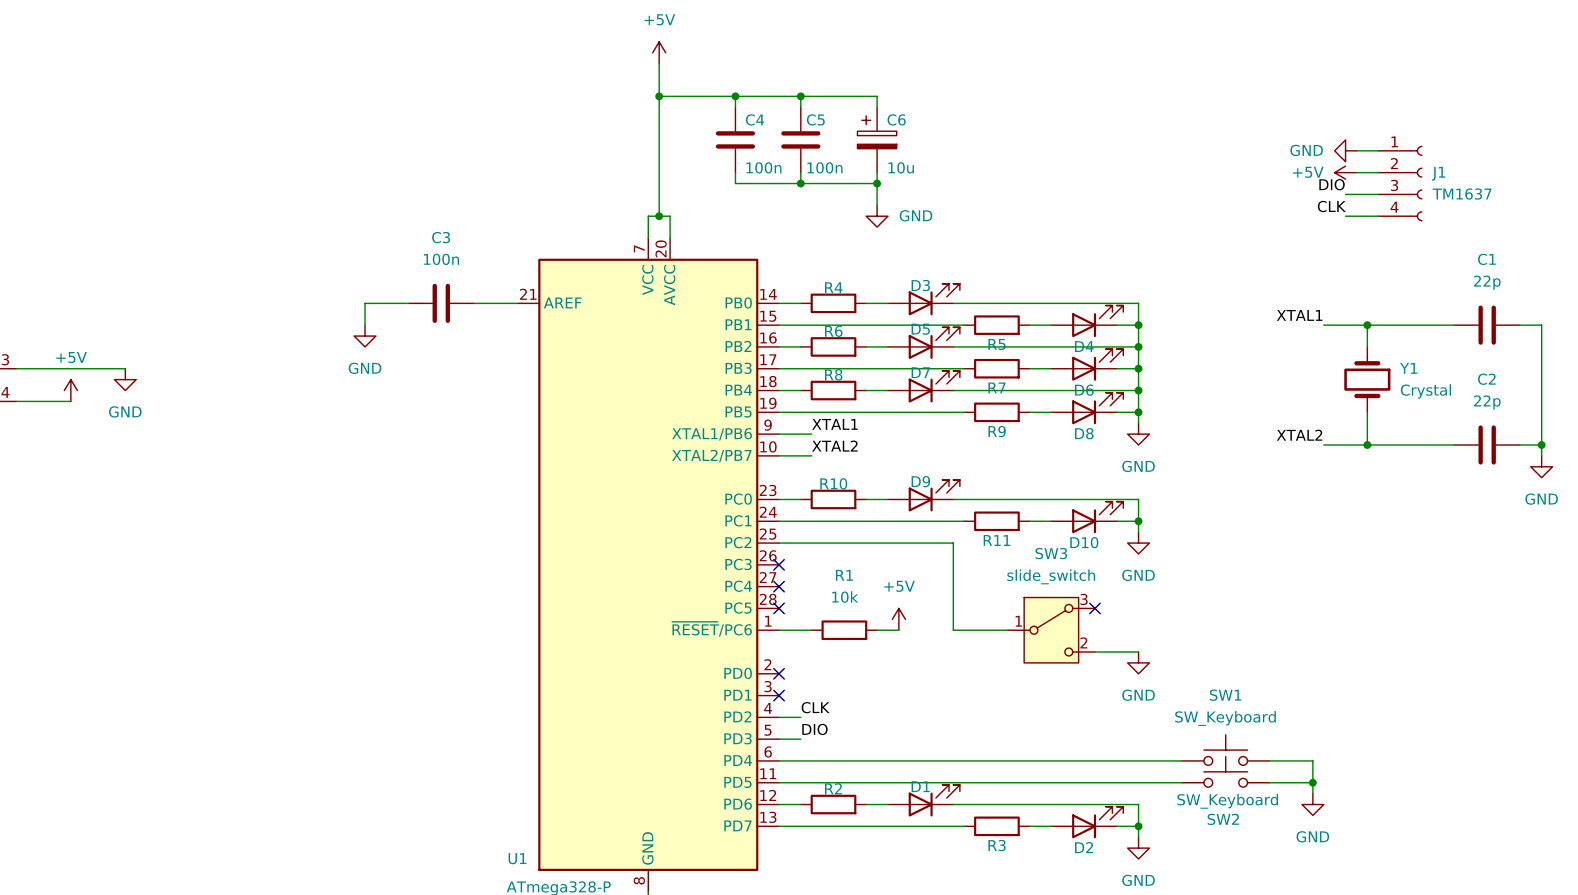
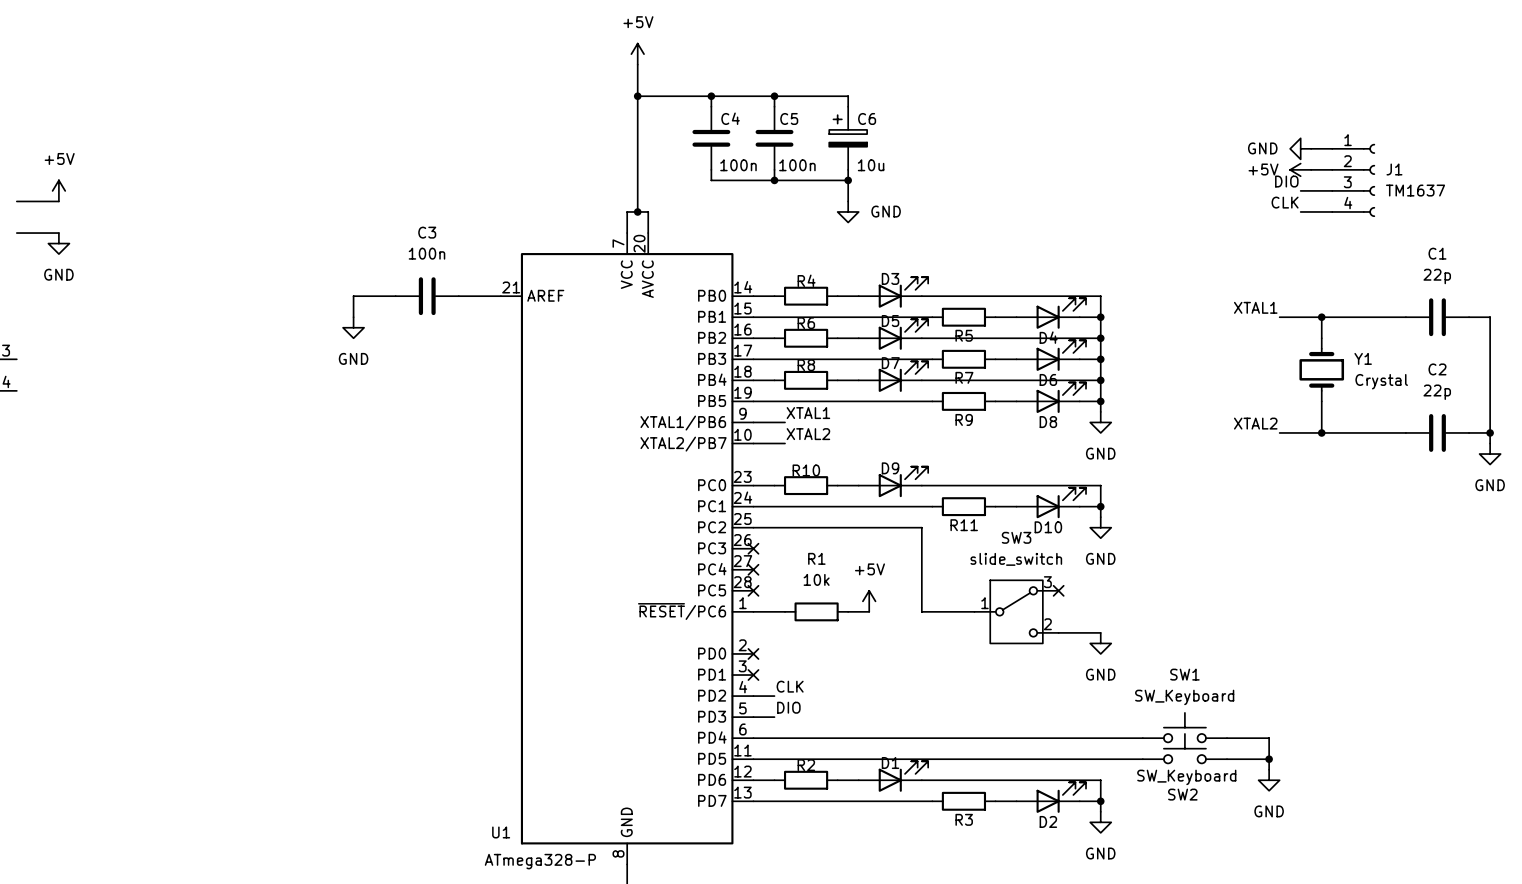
wire: none -> (16, 201) (58, 201)
wire: none -> (16, 233) (58, 233)
wire: (16, 368) (125, 368) -> none
power symbol position: GND (125, 379) -> GND (58, 243)
power symbol position: +5V (70, 390) -> +5V (58, 190)
wire: (16, 401) (70, 401) -> none

